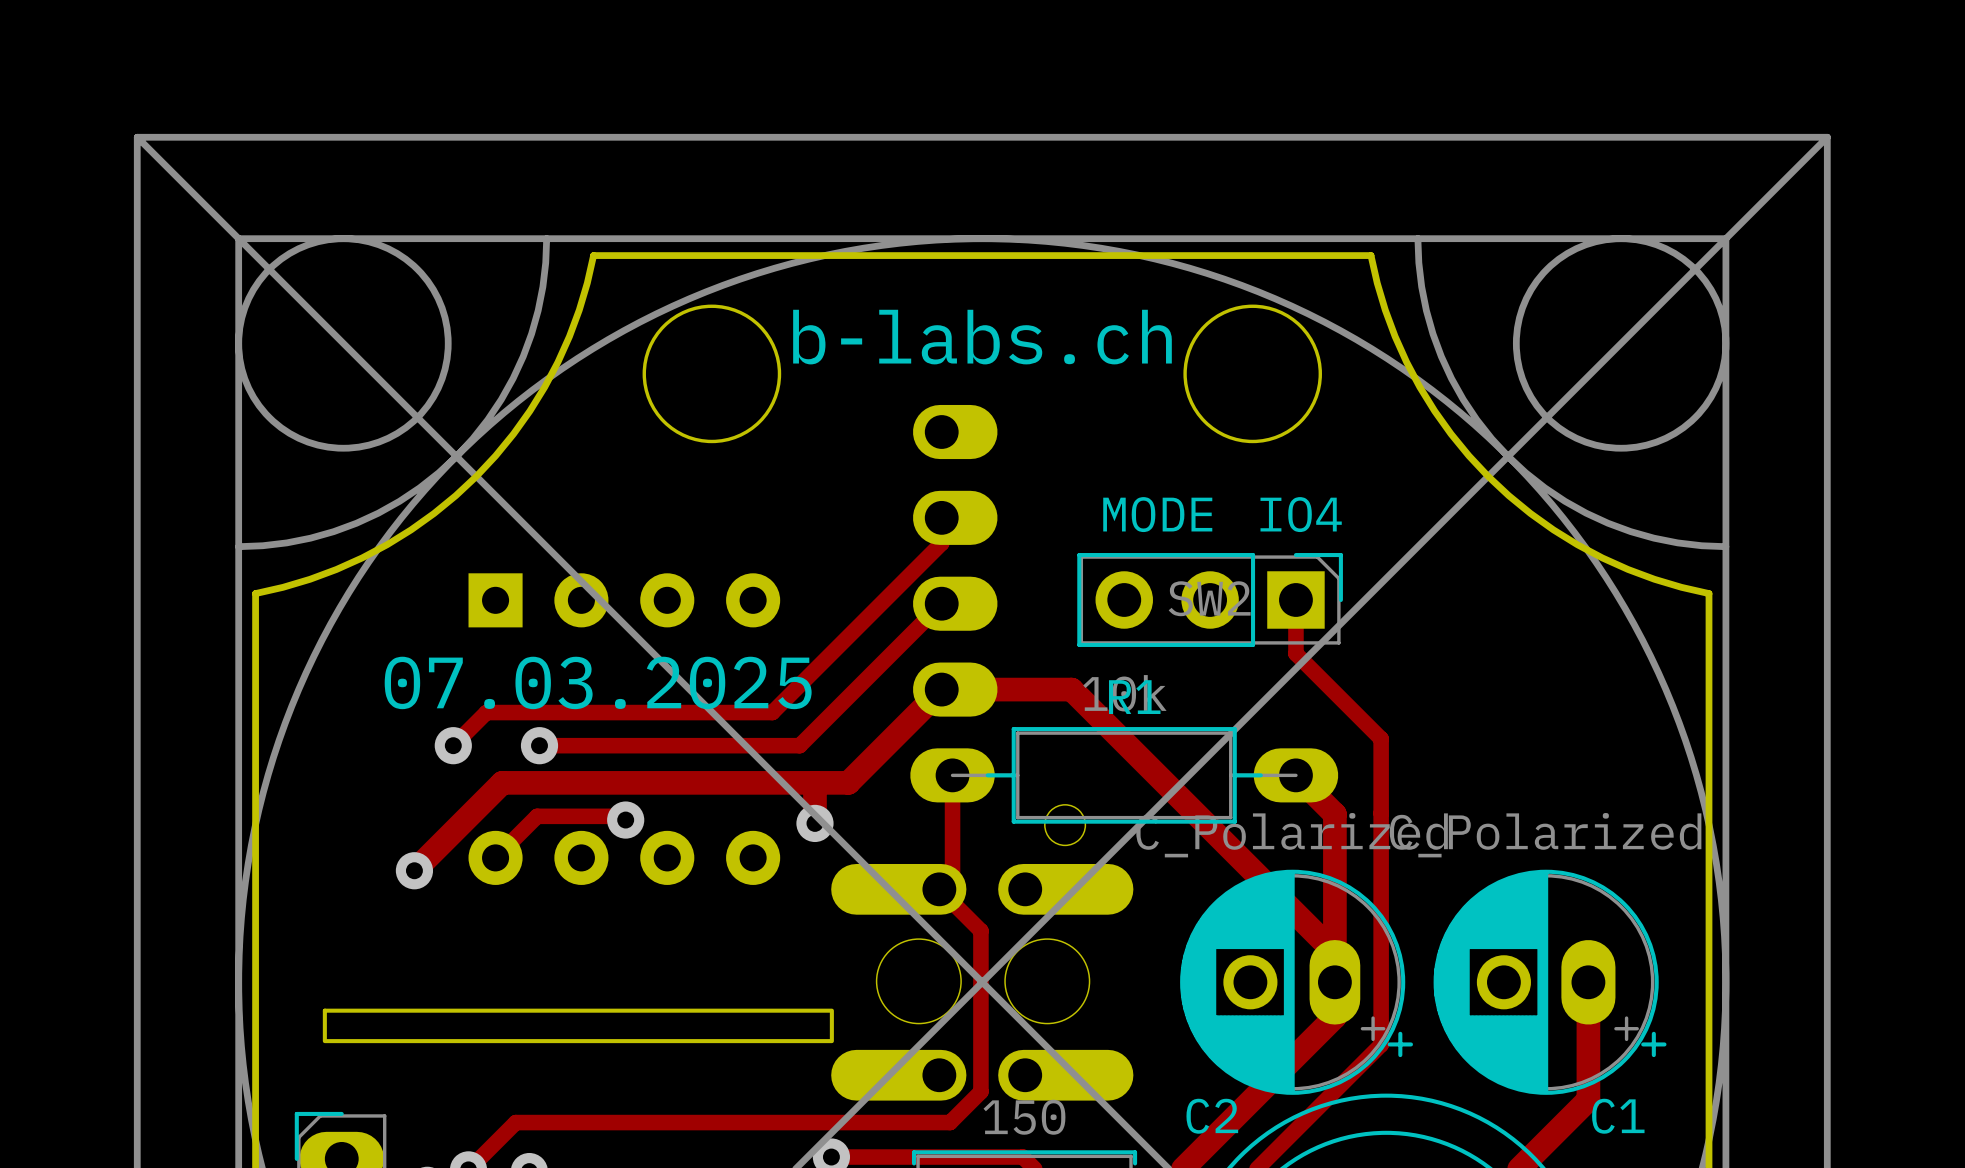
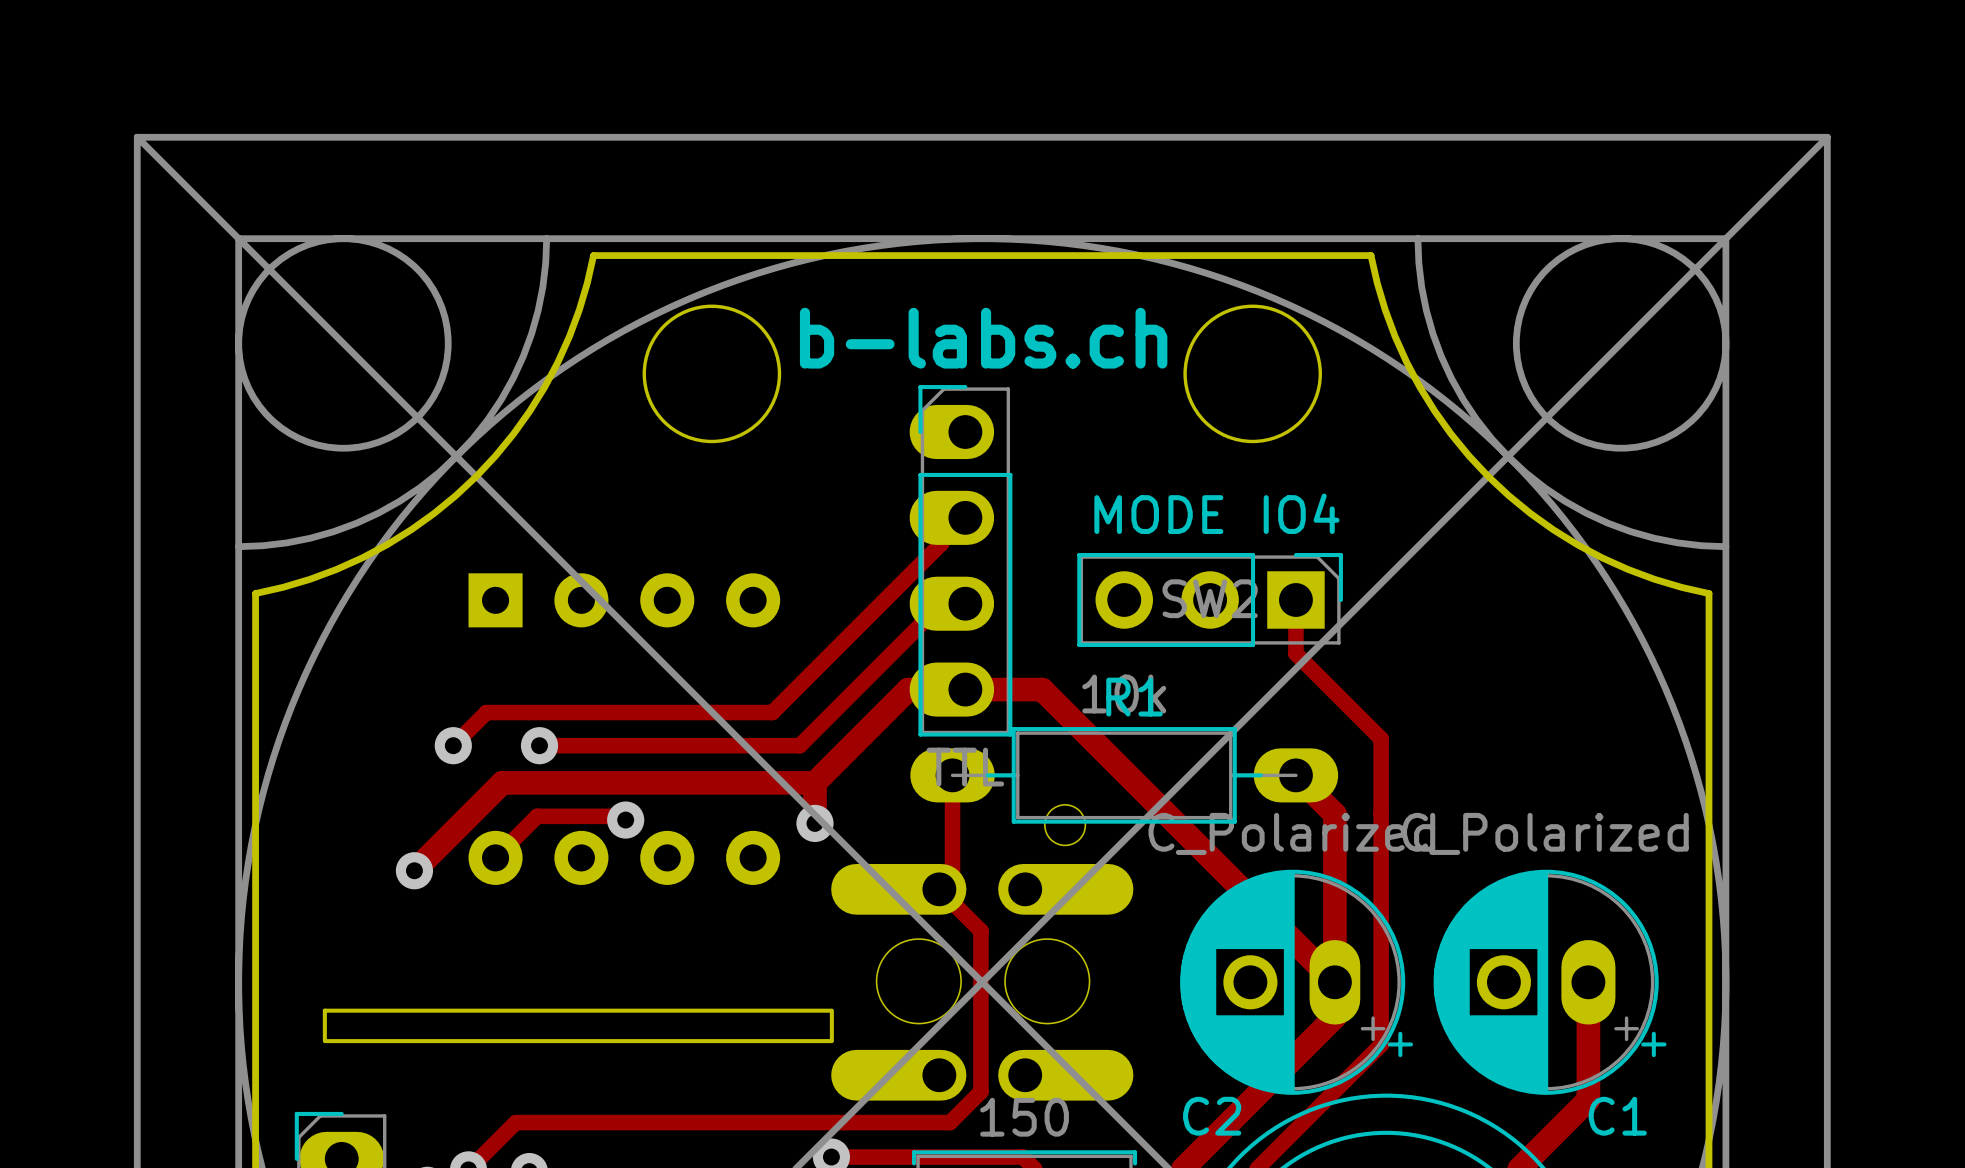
part side: bottom (955, 560) -> top (960, 560)
text: 07.03.2025 (598, 682) -> none
track: (941, 689) (848, 782) (814, 782) -> (941, 689) (908, 689) (814, 782)
track: (1042, 689) (1071, 689) (1334, 952) -> (1042, 689) (1334, 982)

